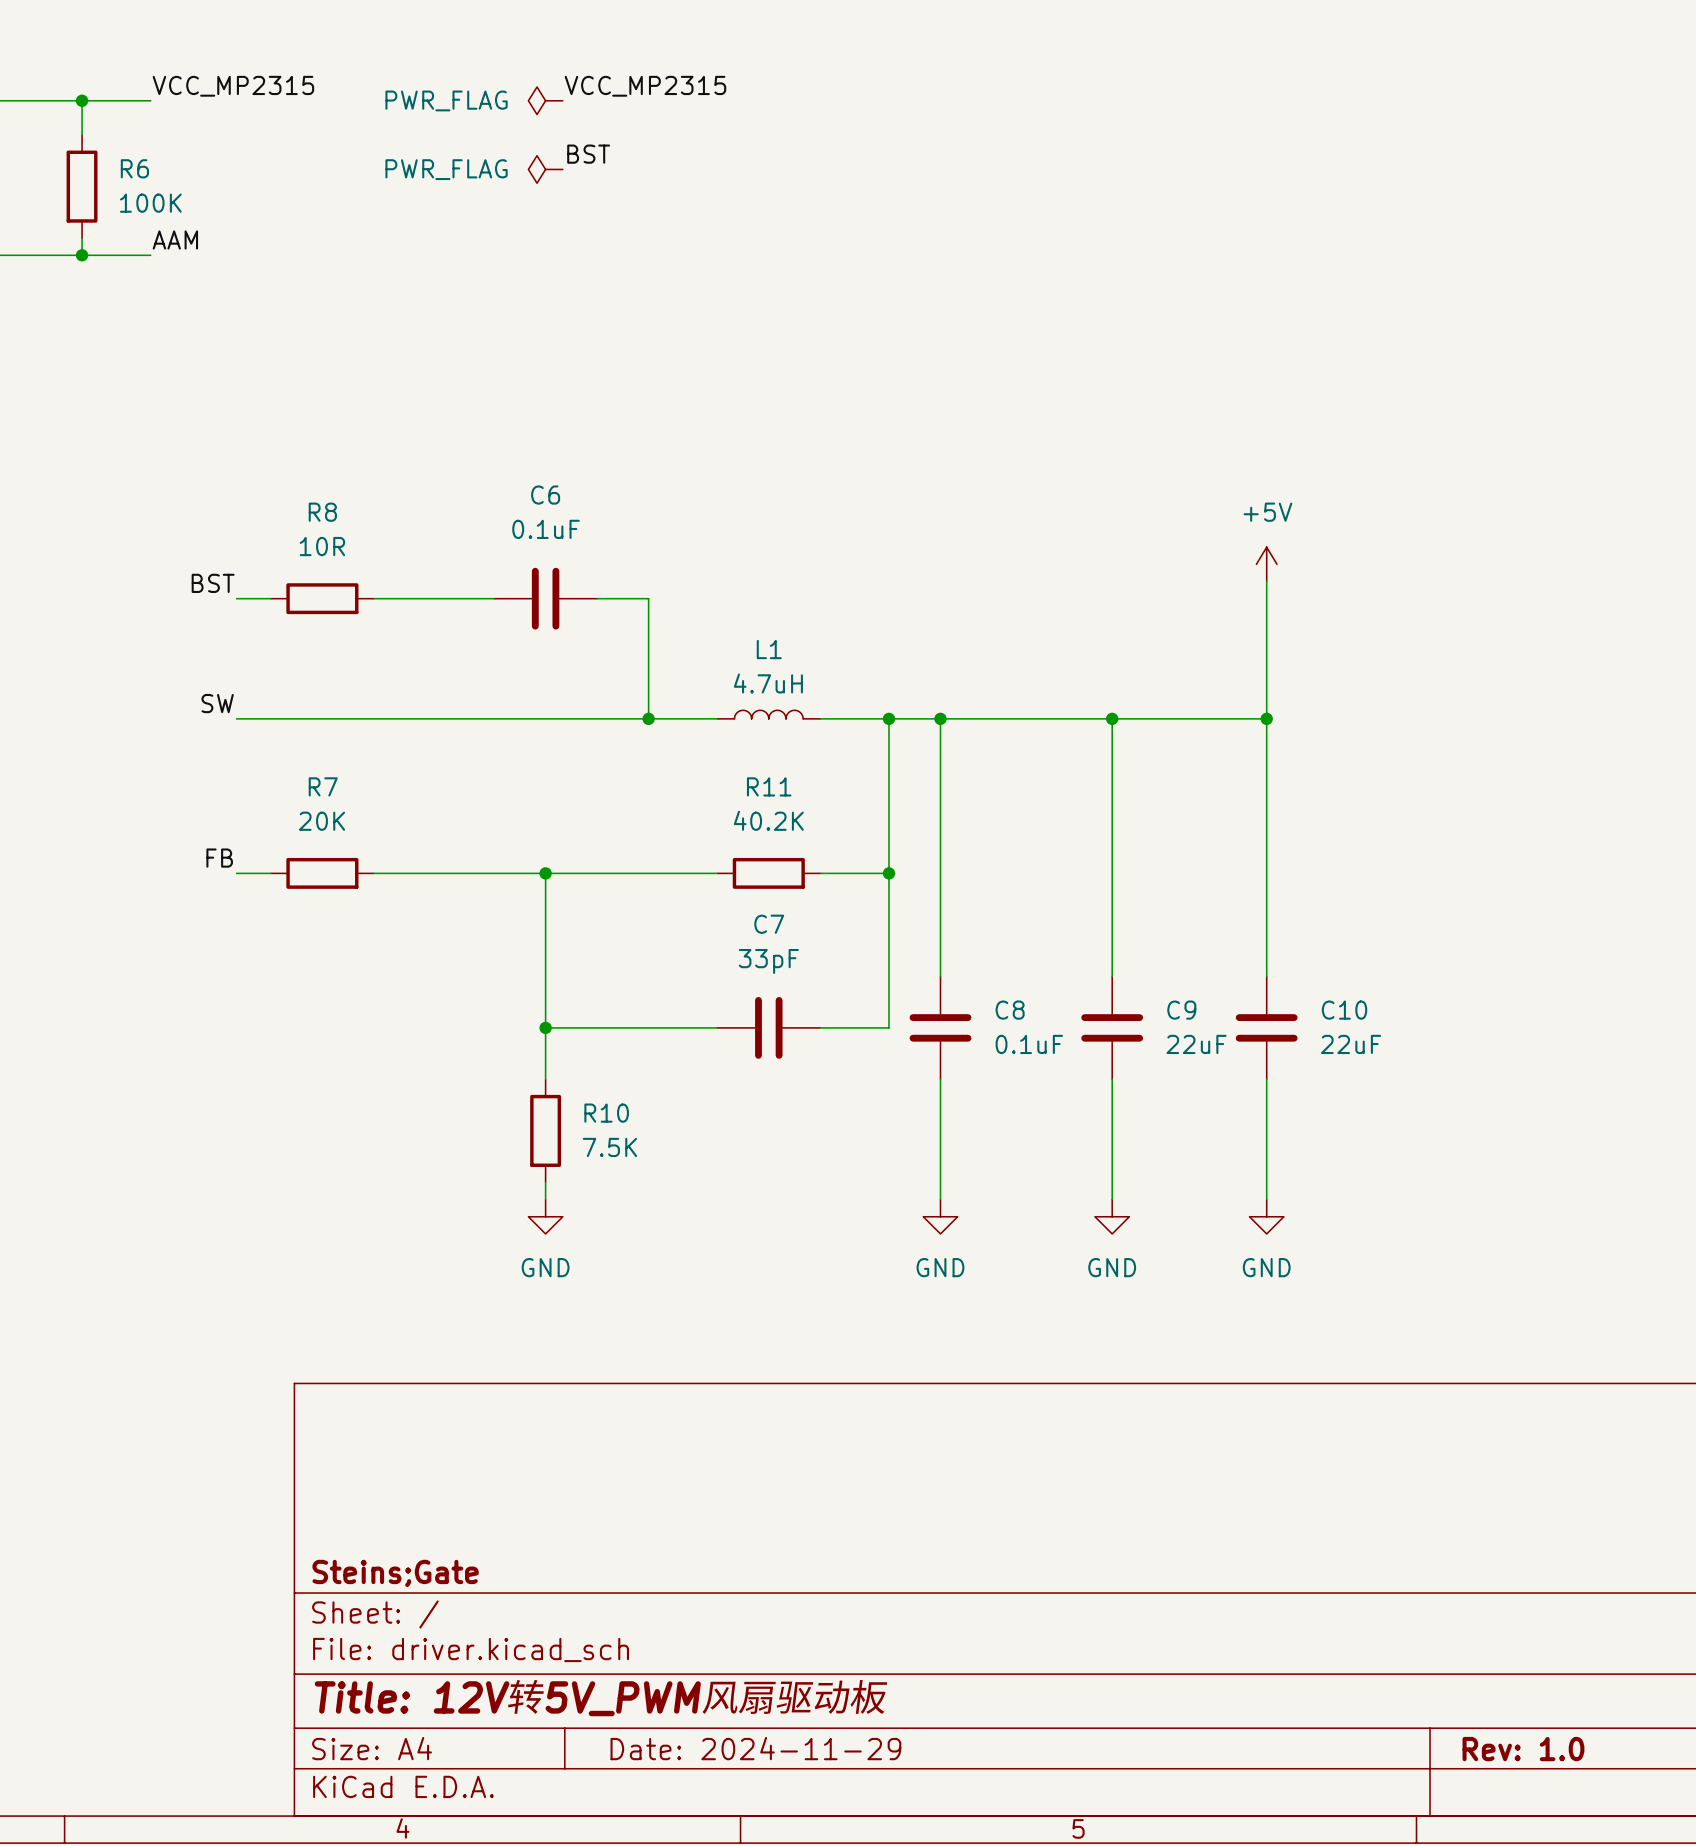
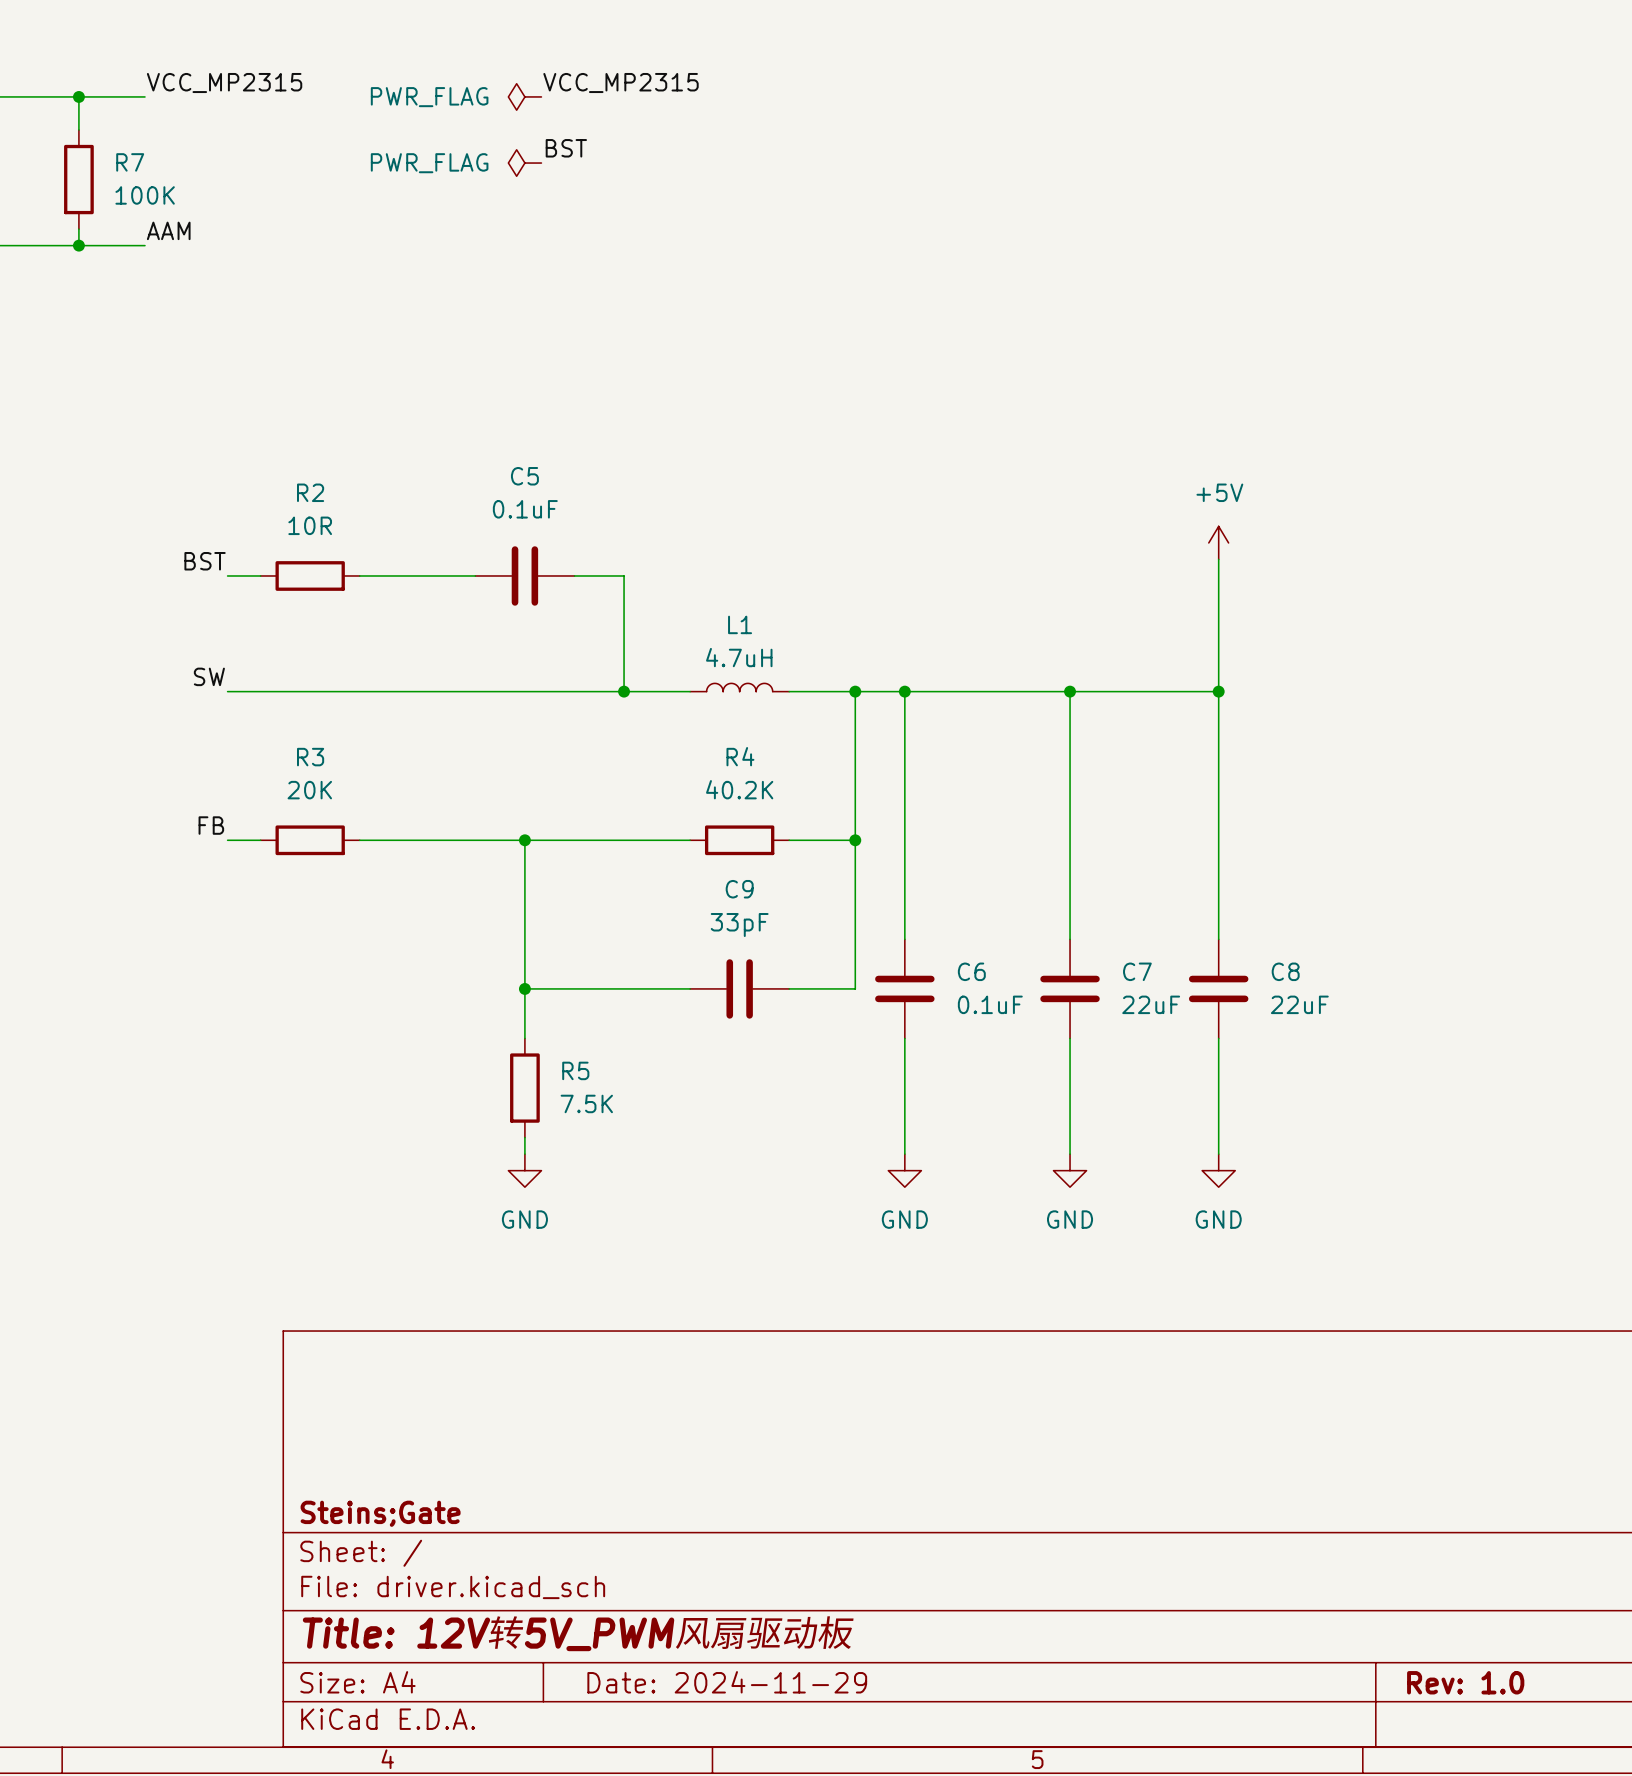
R6 name: R6 (134, 168) -> R7 (130, 162)
C6 name: C6 (545, 495) -> C5 (524, 476)
R8 name: R8 (322, 512) -> R2 (310, 492)
R7 name: R7 (323, 786) -> R3 (310, 757)
R11 name: R11 (769, 786) -> R4 (740, 756)
C7 name: C7 (769, 924) -> C9 (739, 889)
C8 name: C8 (1010, 1010) -> C6 (971, 971)
C9 name: C9 (1181, 1010) -> C7 (1137, 971)
C10 name: C10 (1344, 1010) -> C8 (1285, 971)
R10 name: R10 (606, 1113) -> R5 (575, 1070)

